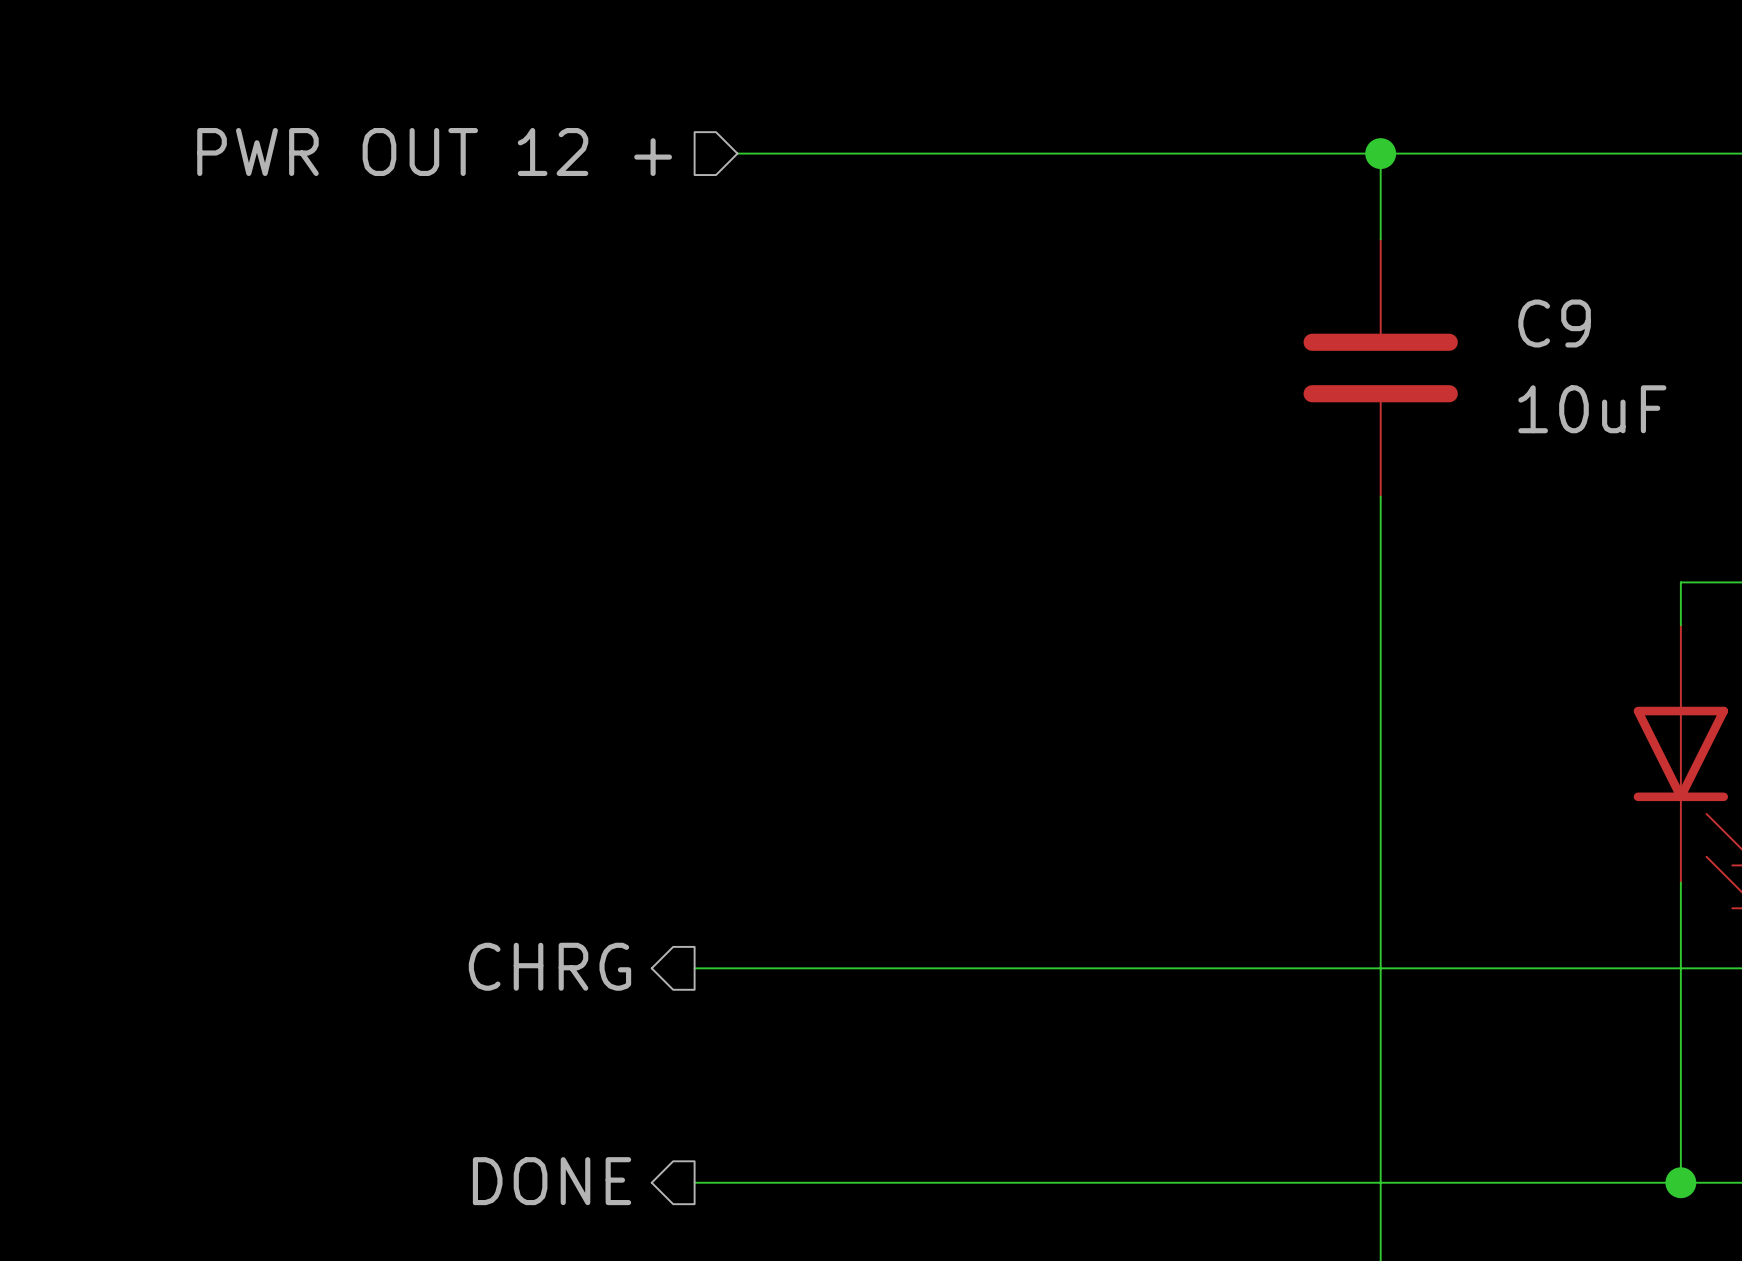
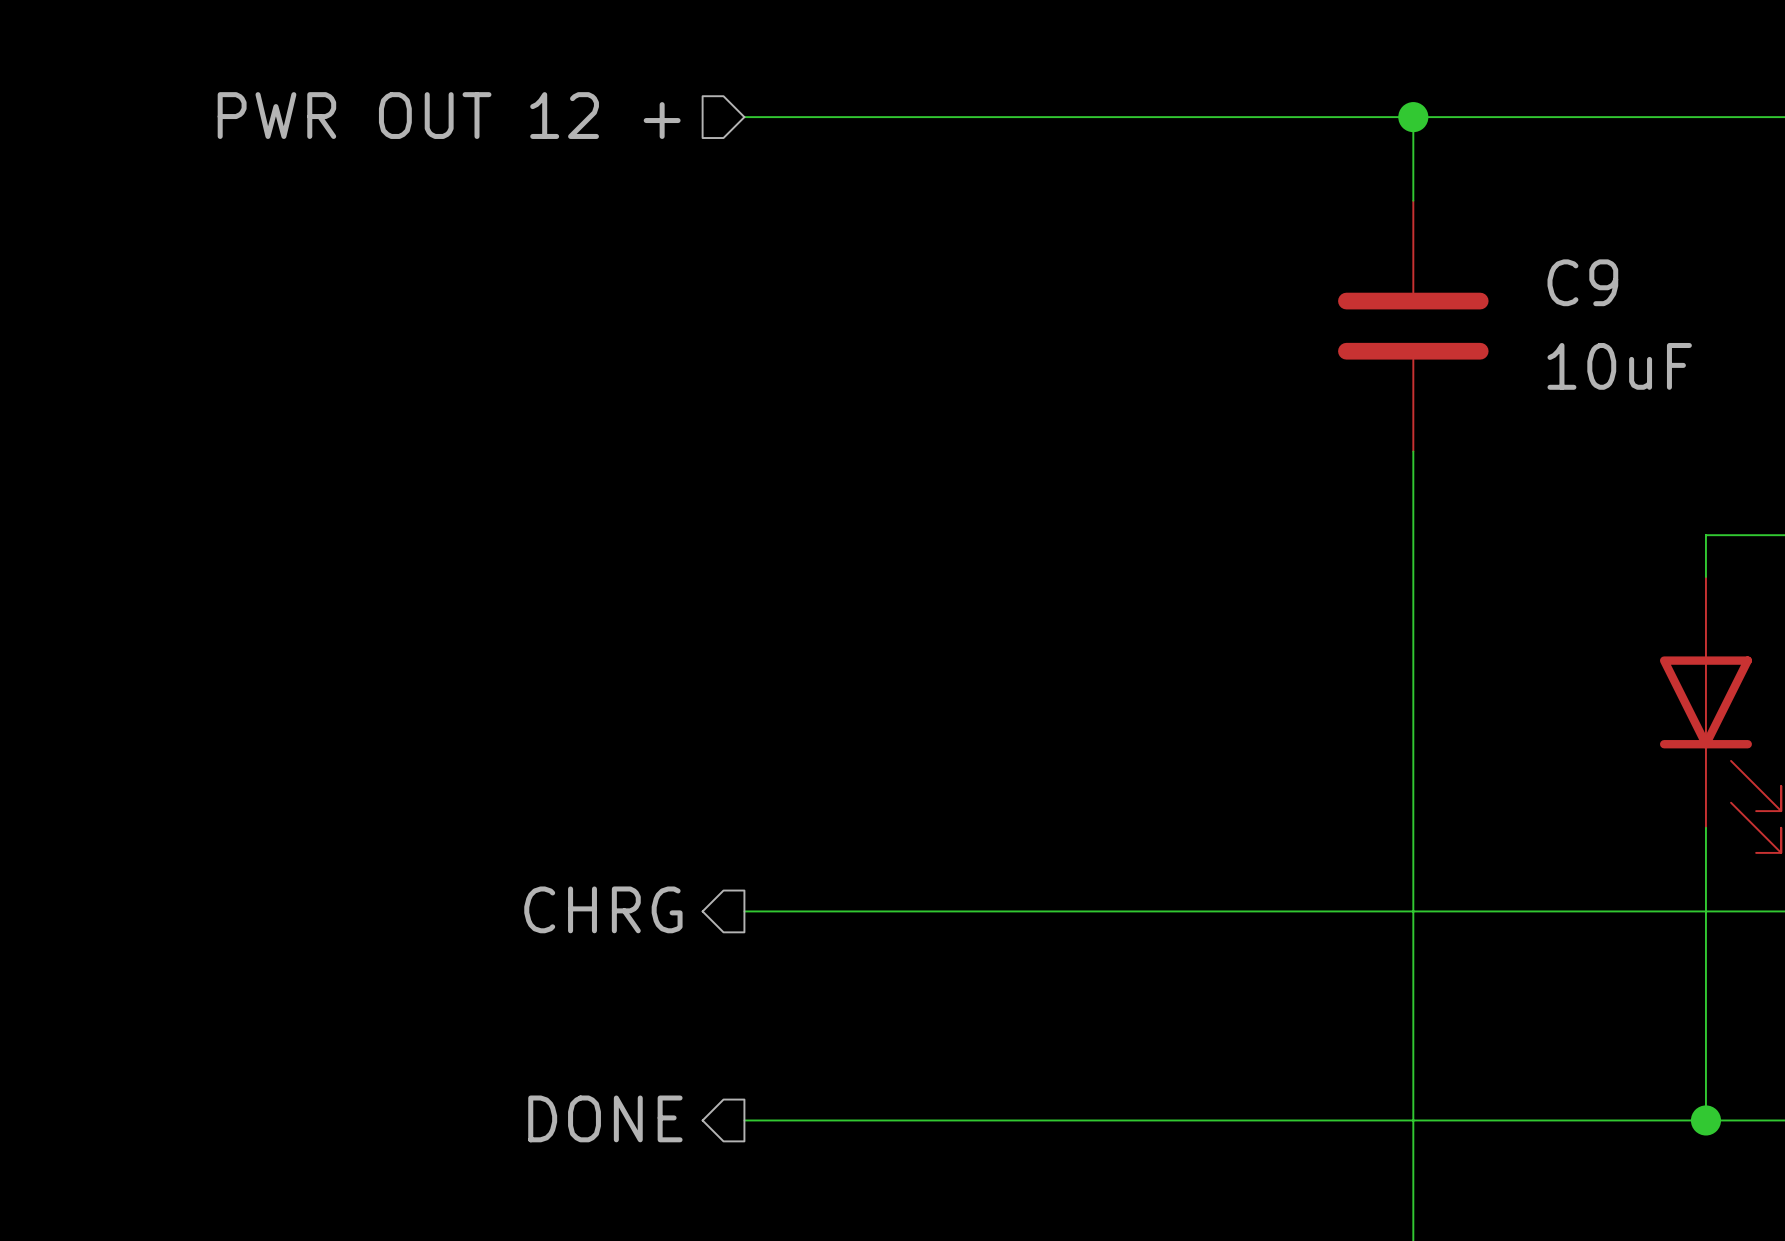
hierarchical label position: PWR OUT 12 + (434, 151) -> PWR OUT 12 + (449, 115)
wire: none -> (744, 117) (786, 117)

